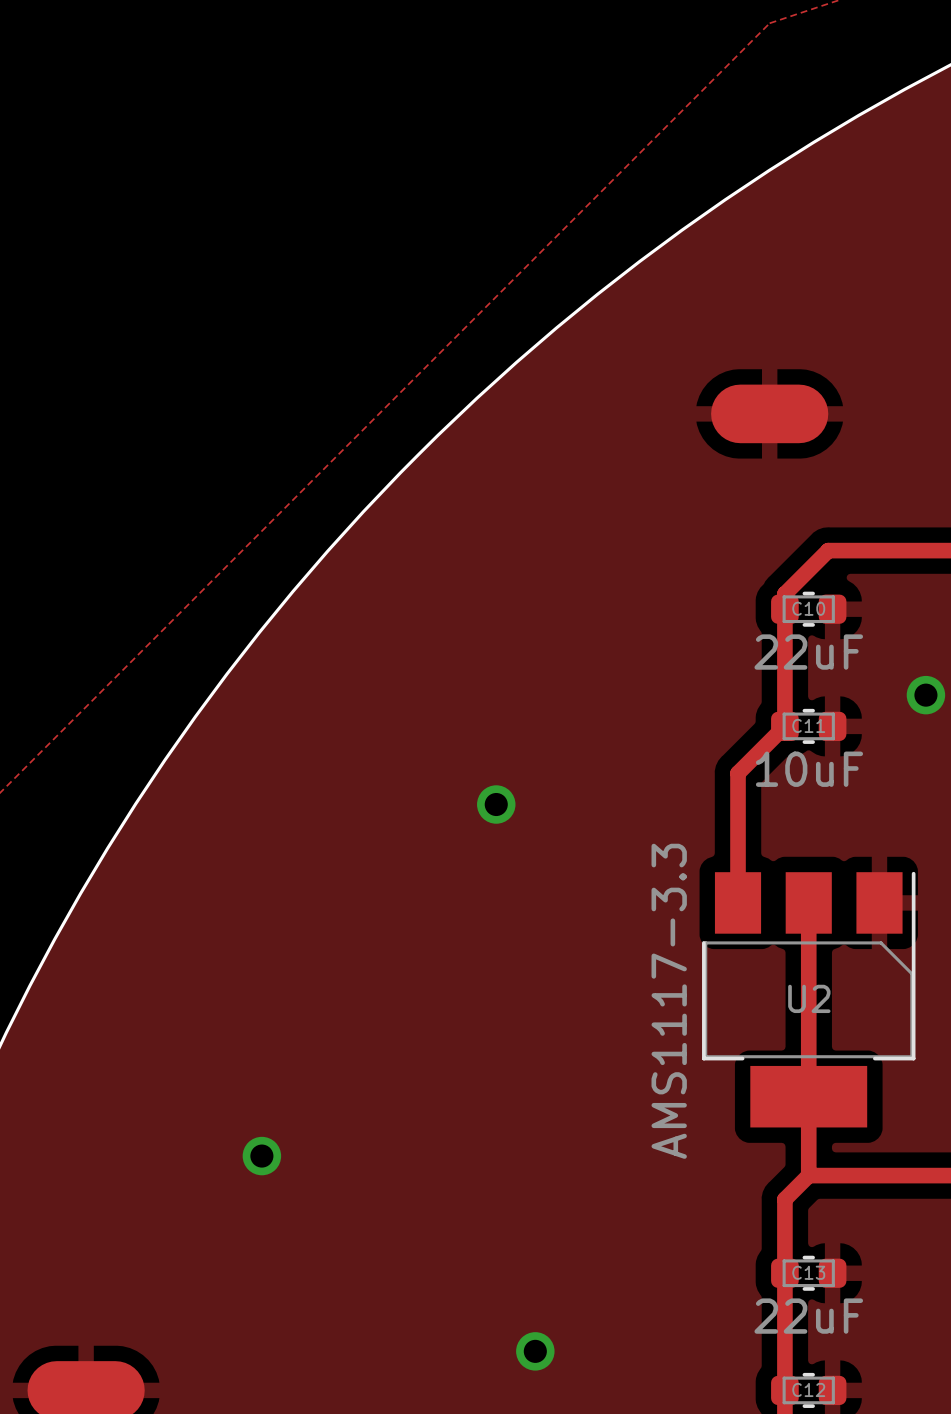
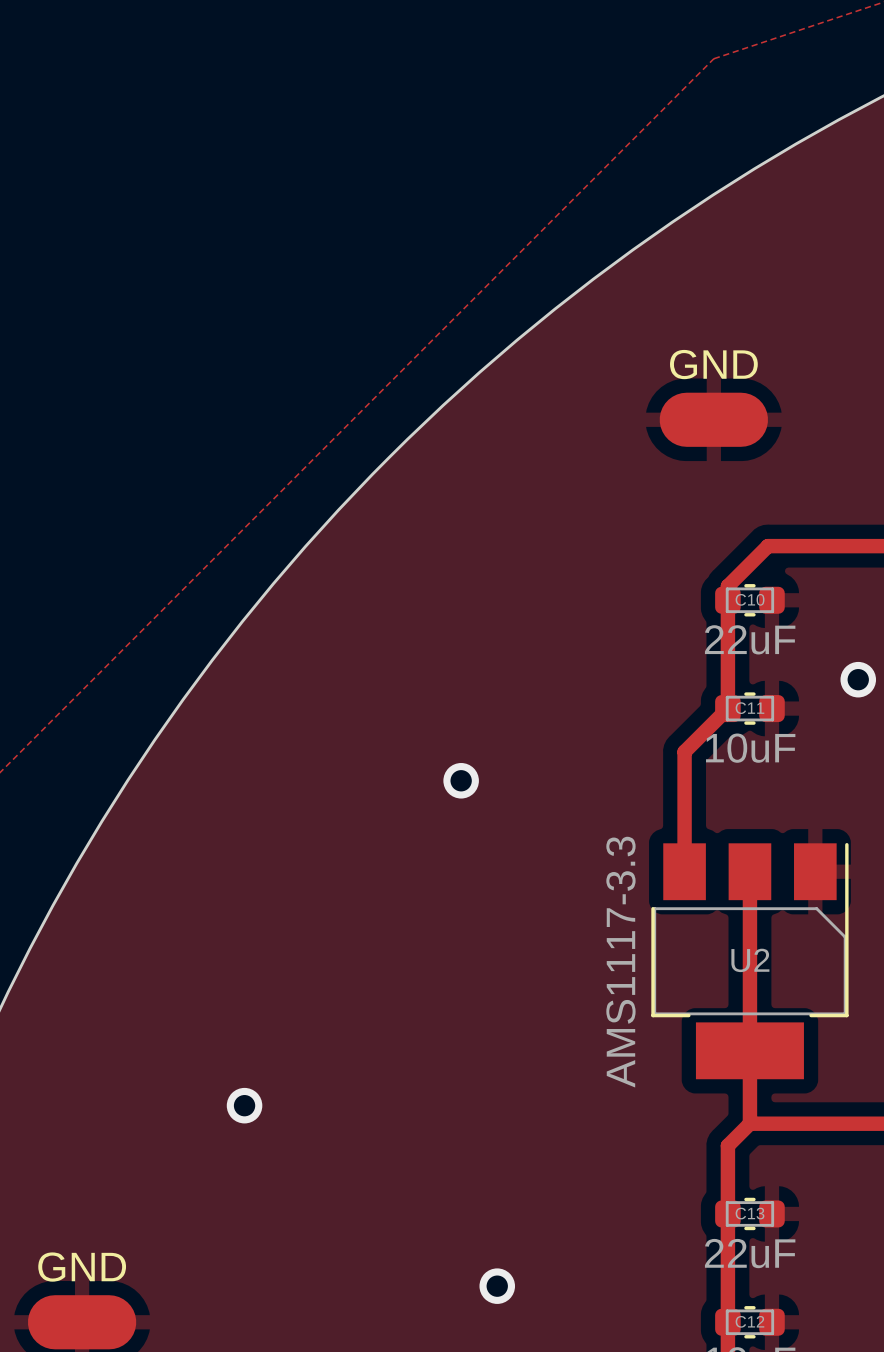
text: none -> GND (713, 364)
text: none -> GND (82, 1267)

